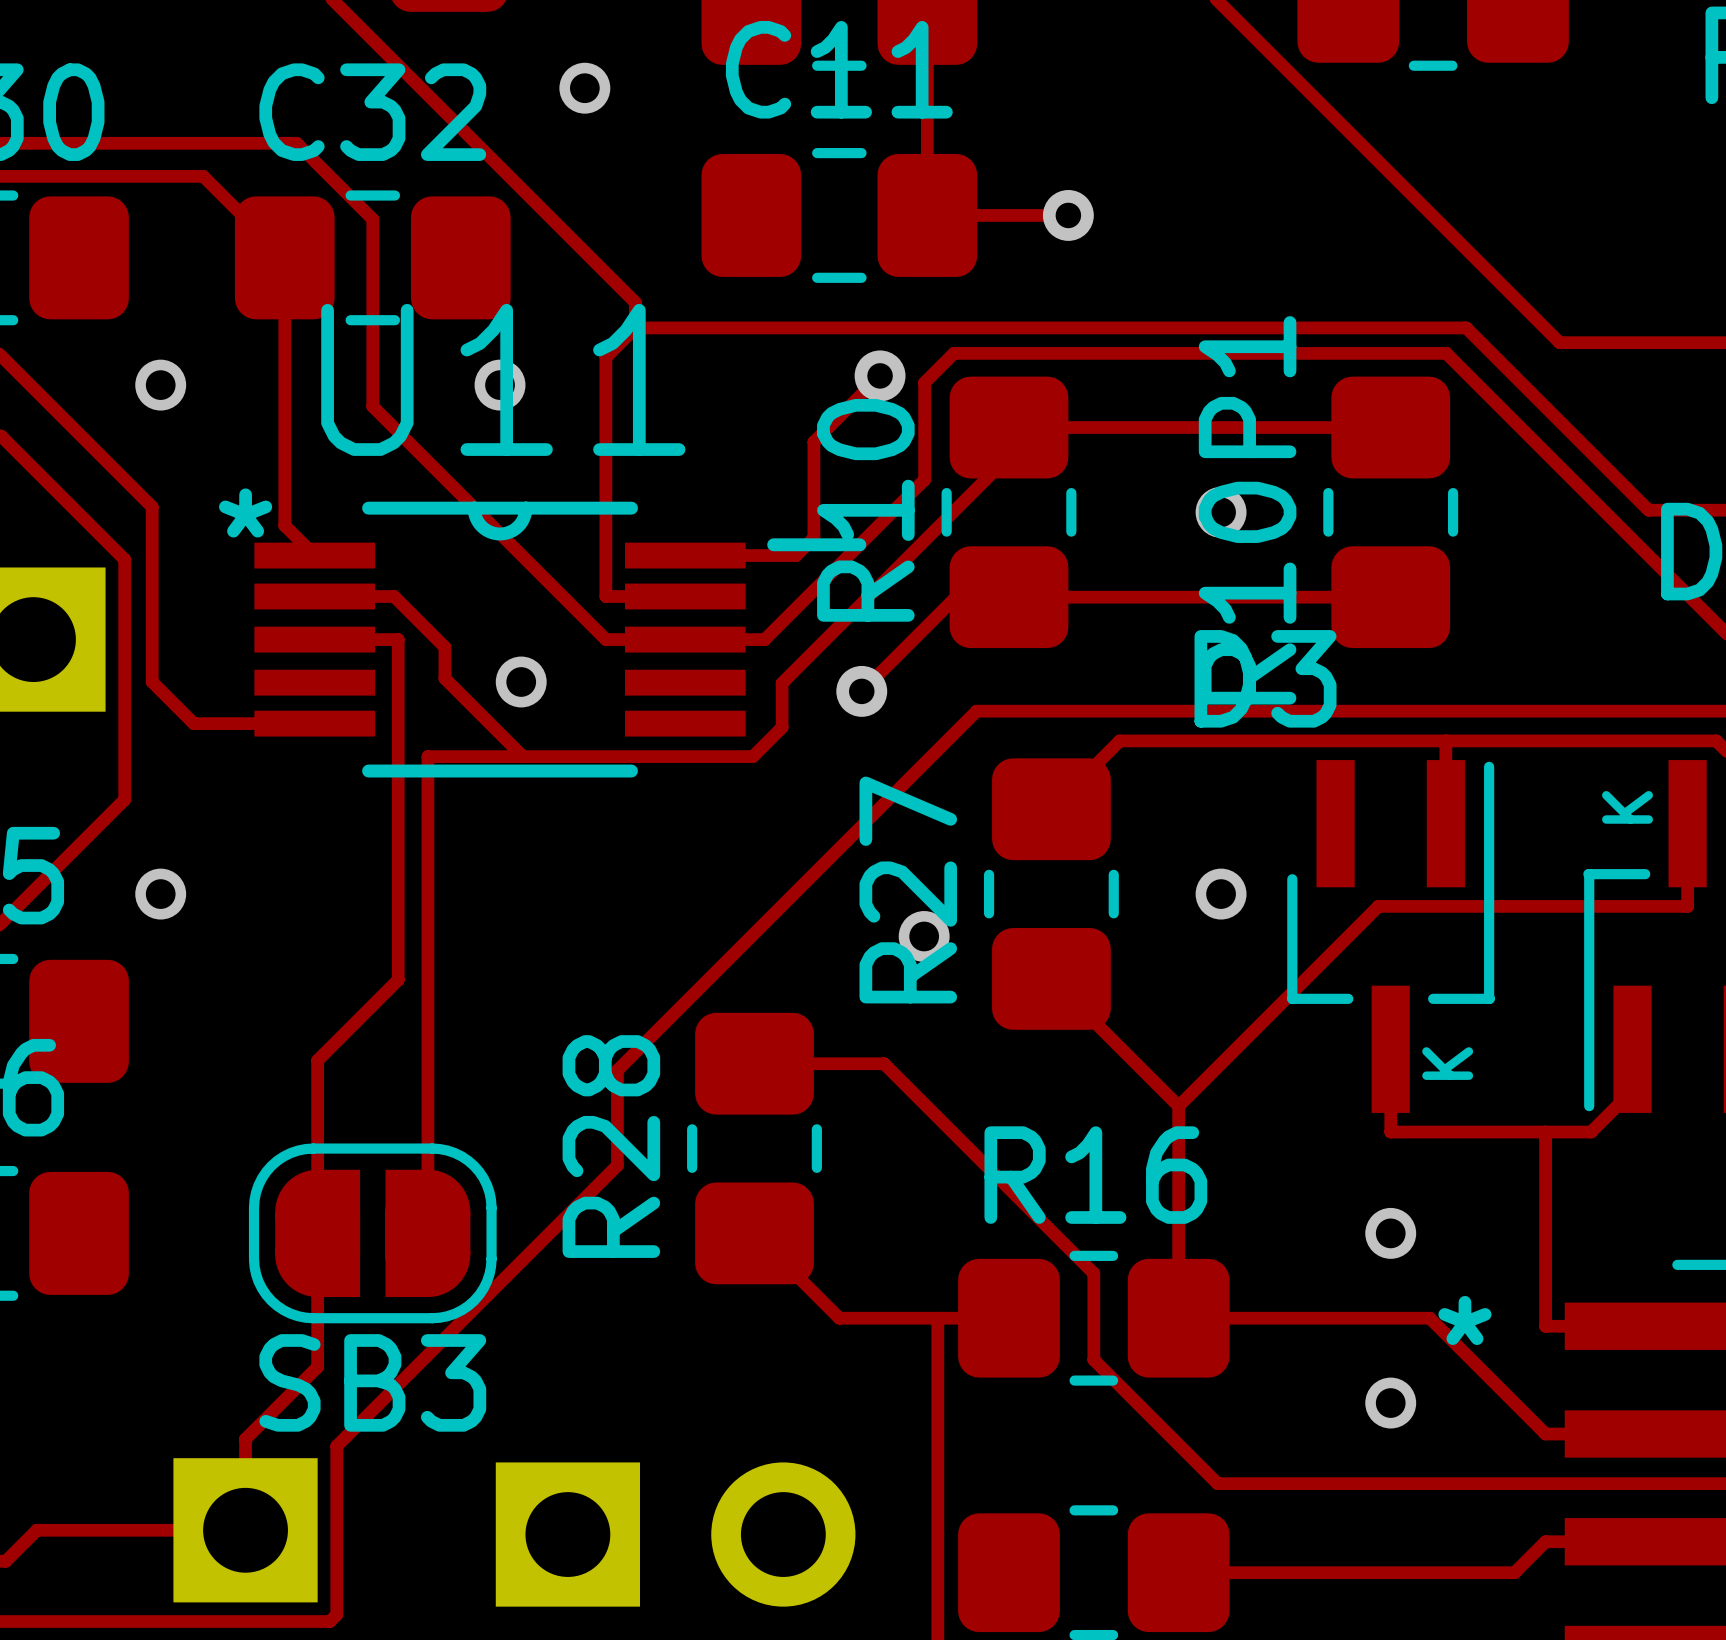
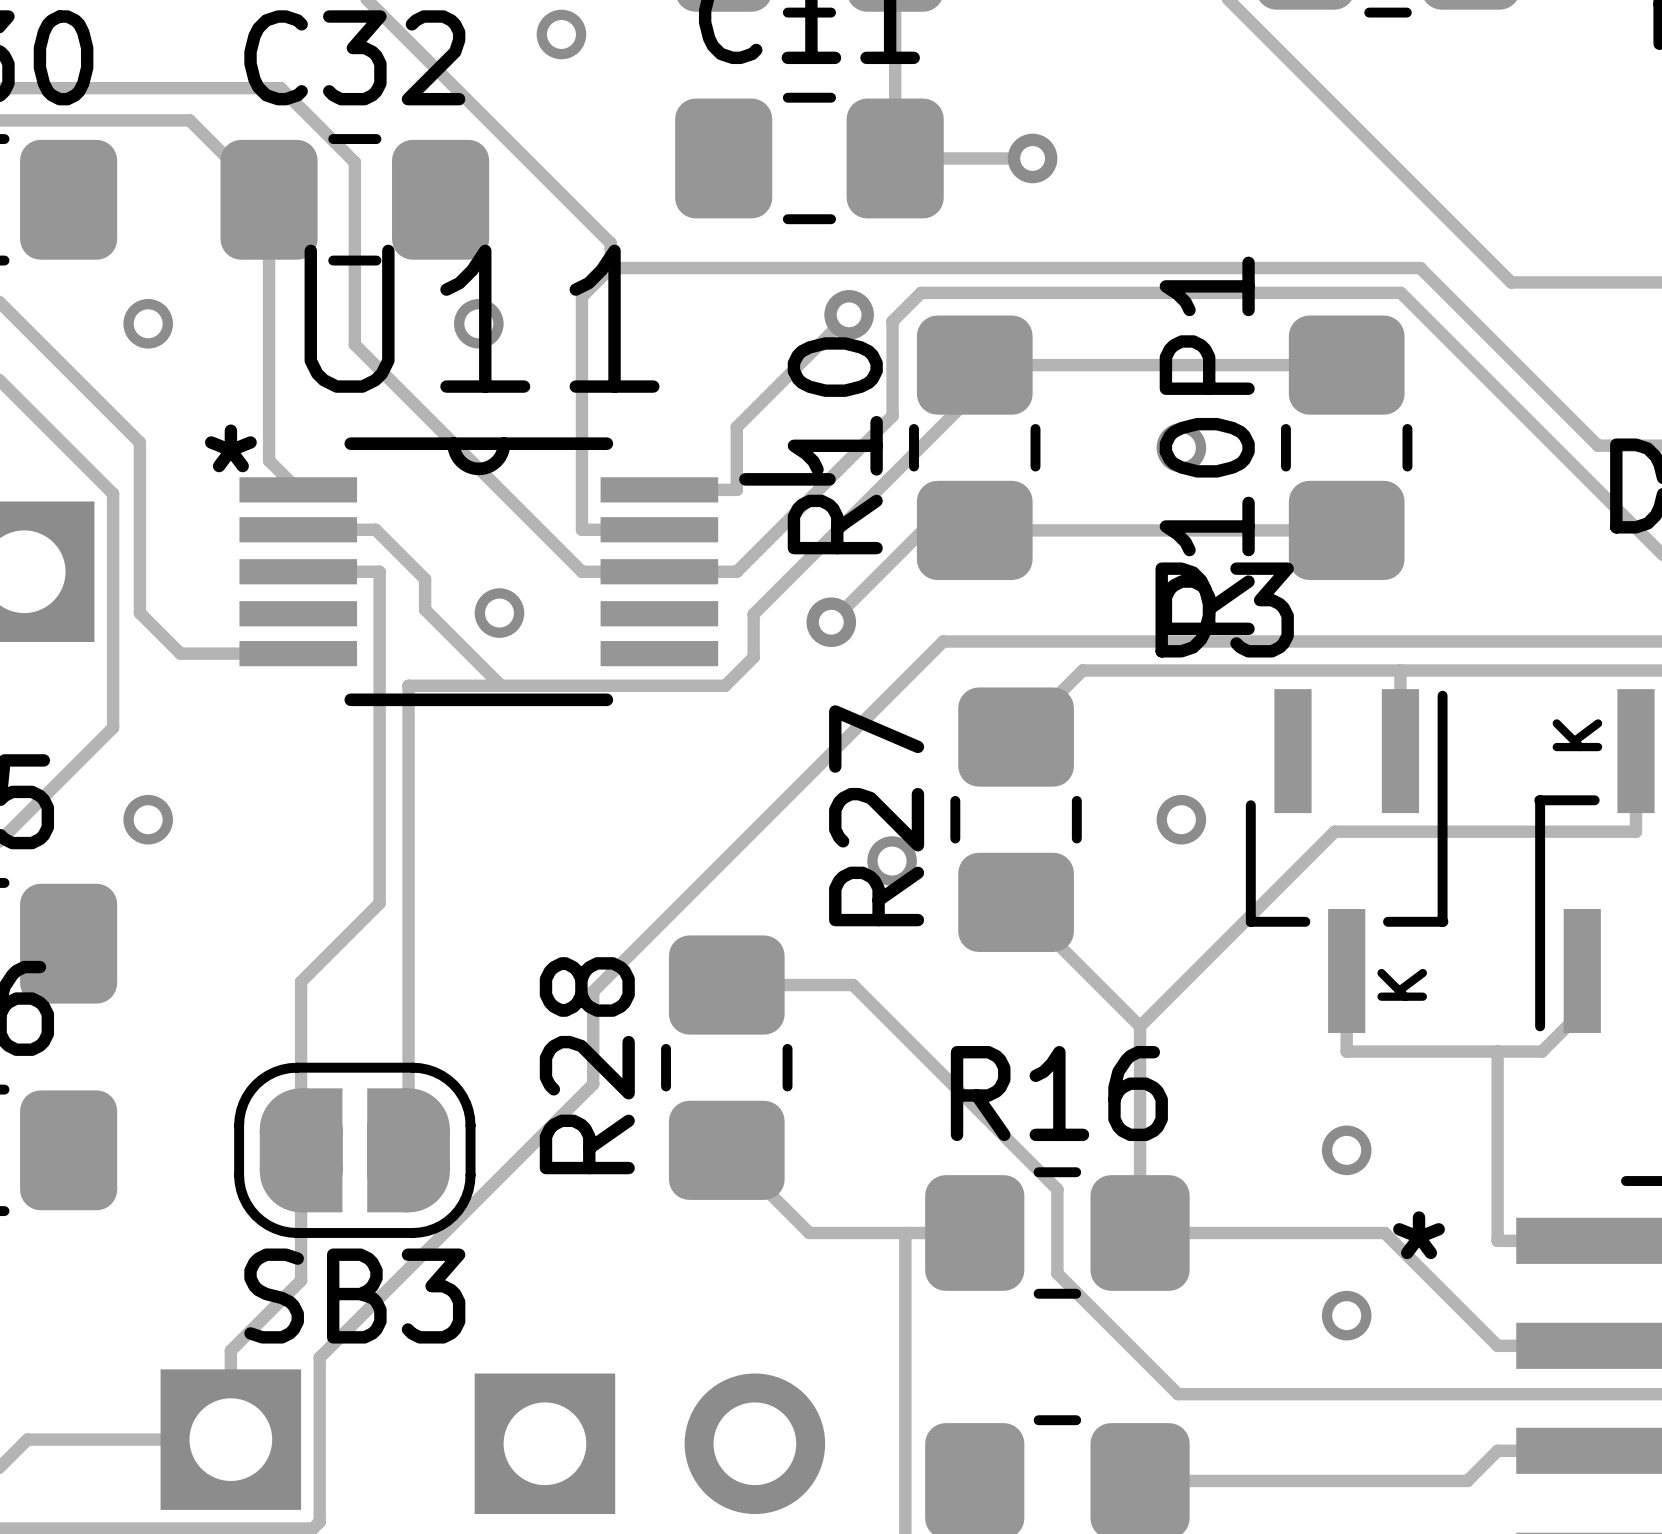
track: (813, 442) (813, 537) (796, 555) (764, 555) -> (784, 379) (736, 427) (736, 489)

